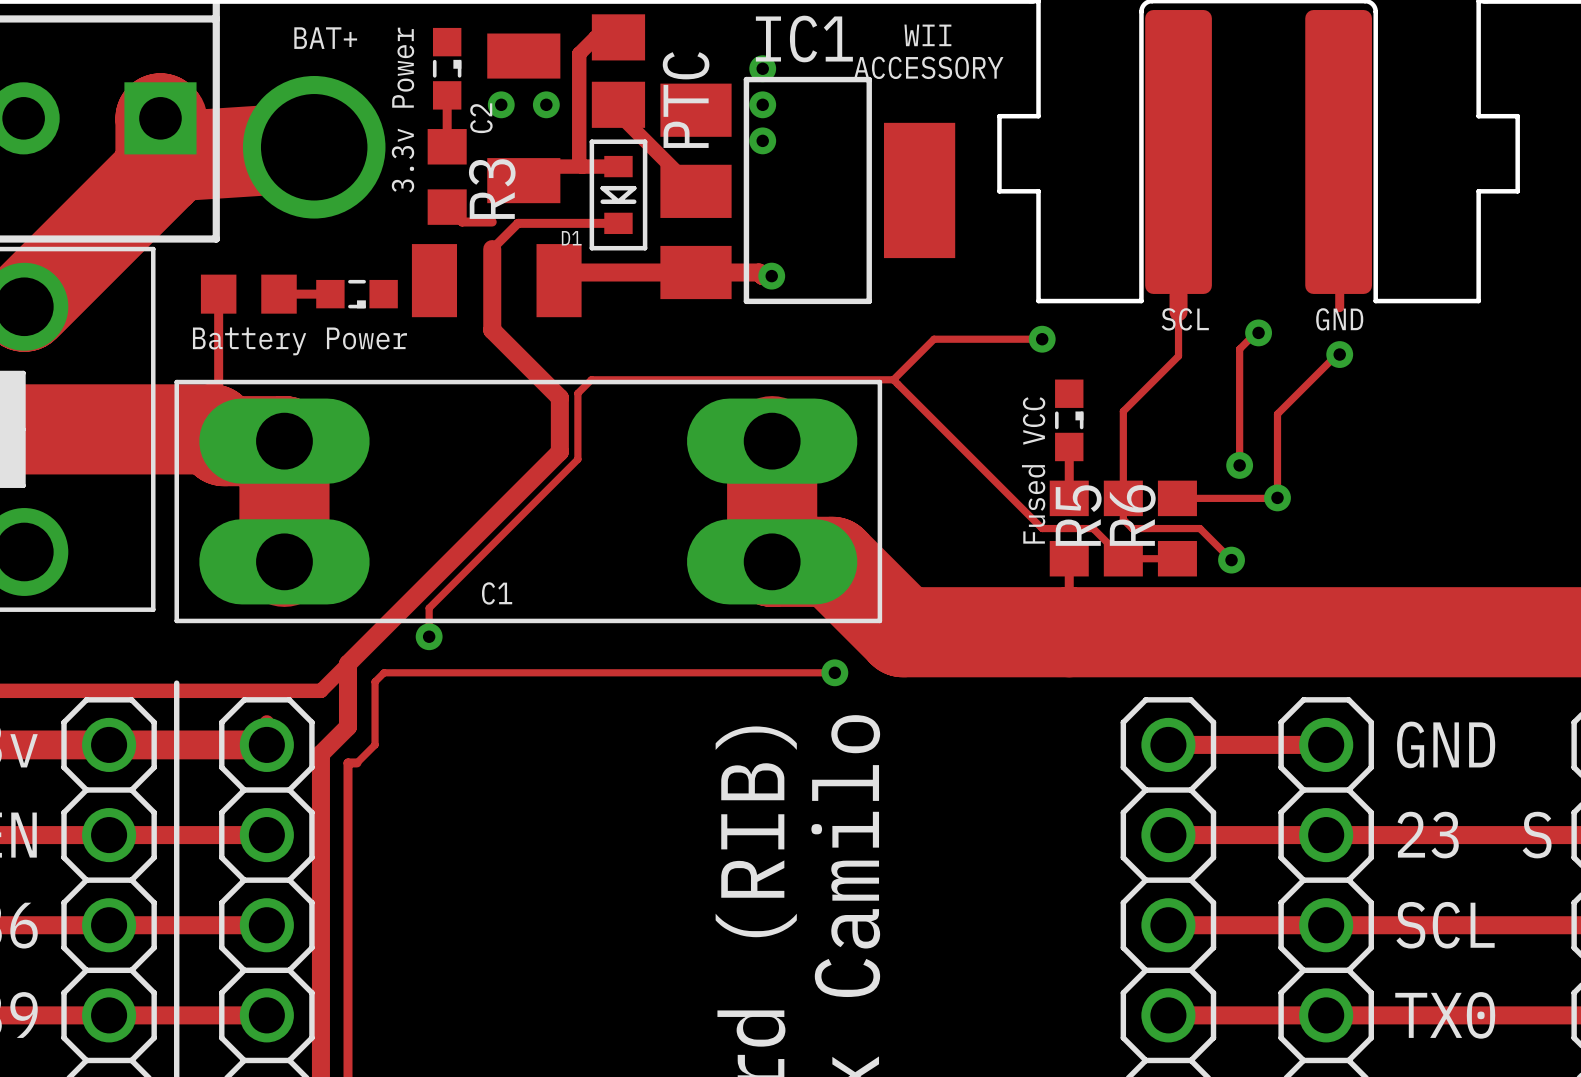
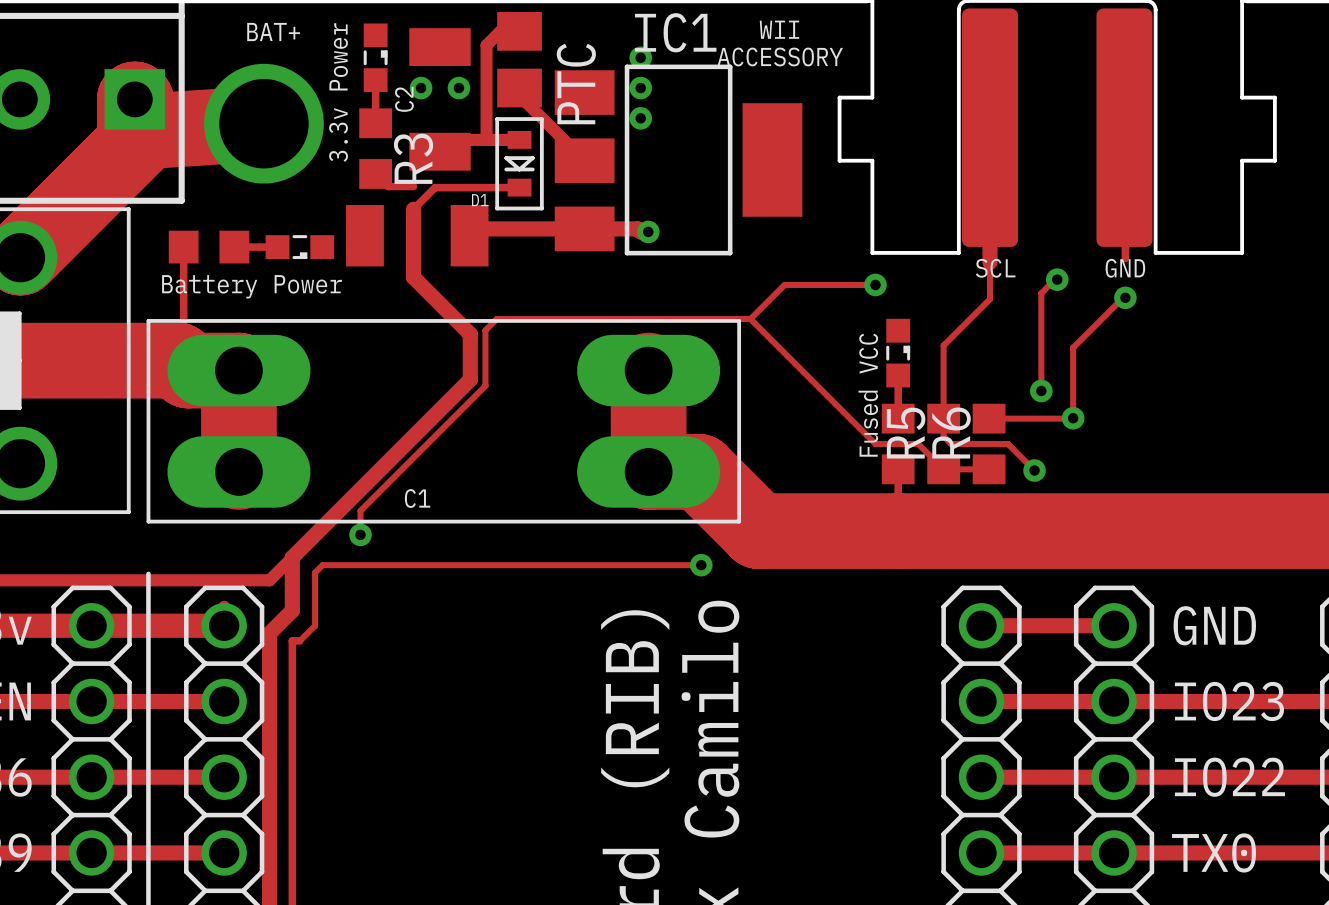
text: 23 (1428, 835) -> IO23 (1229, 701)
text: S (1537, 835) -> none
text: SCL (1445, 925) -> IO22 (1229, 777)

